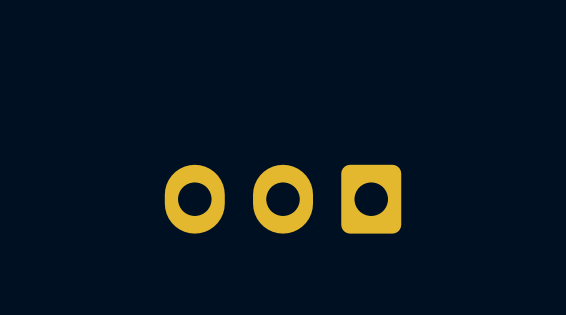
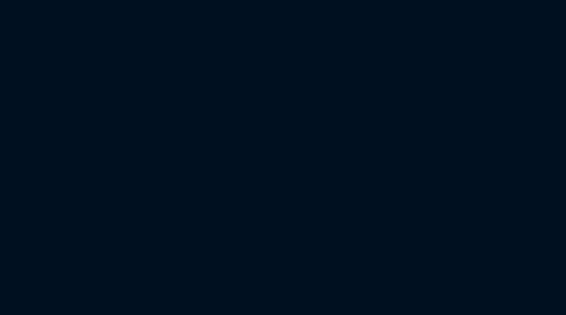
part: (283, 199) -> none

